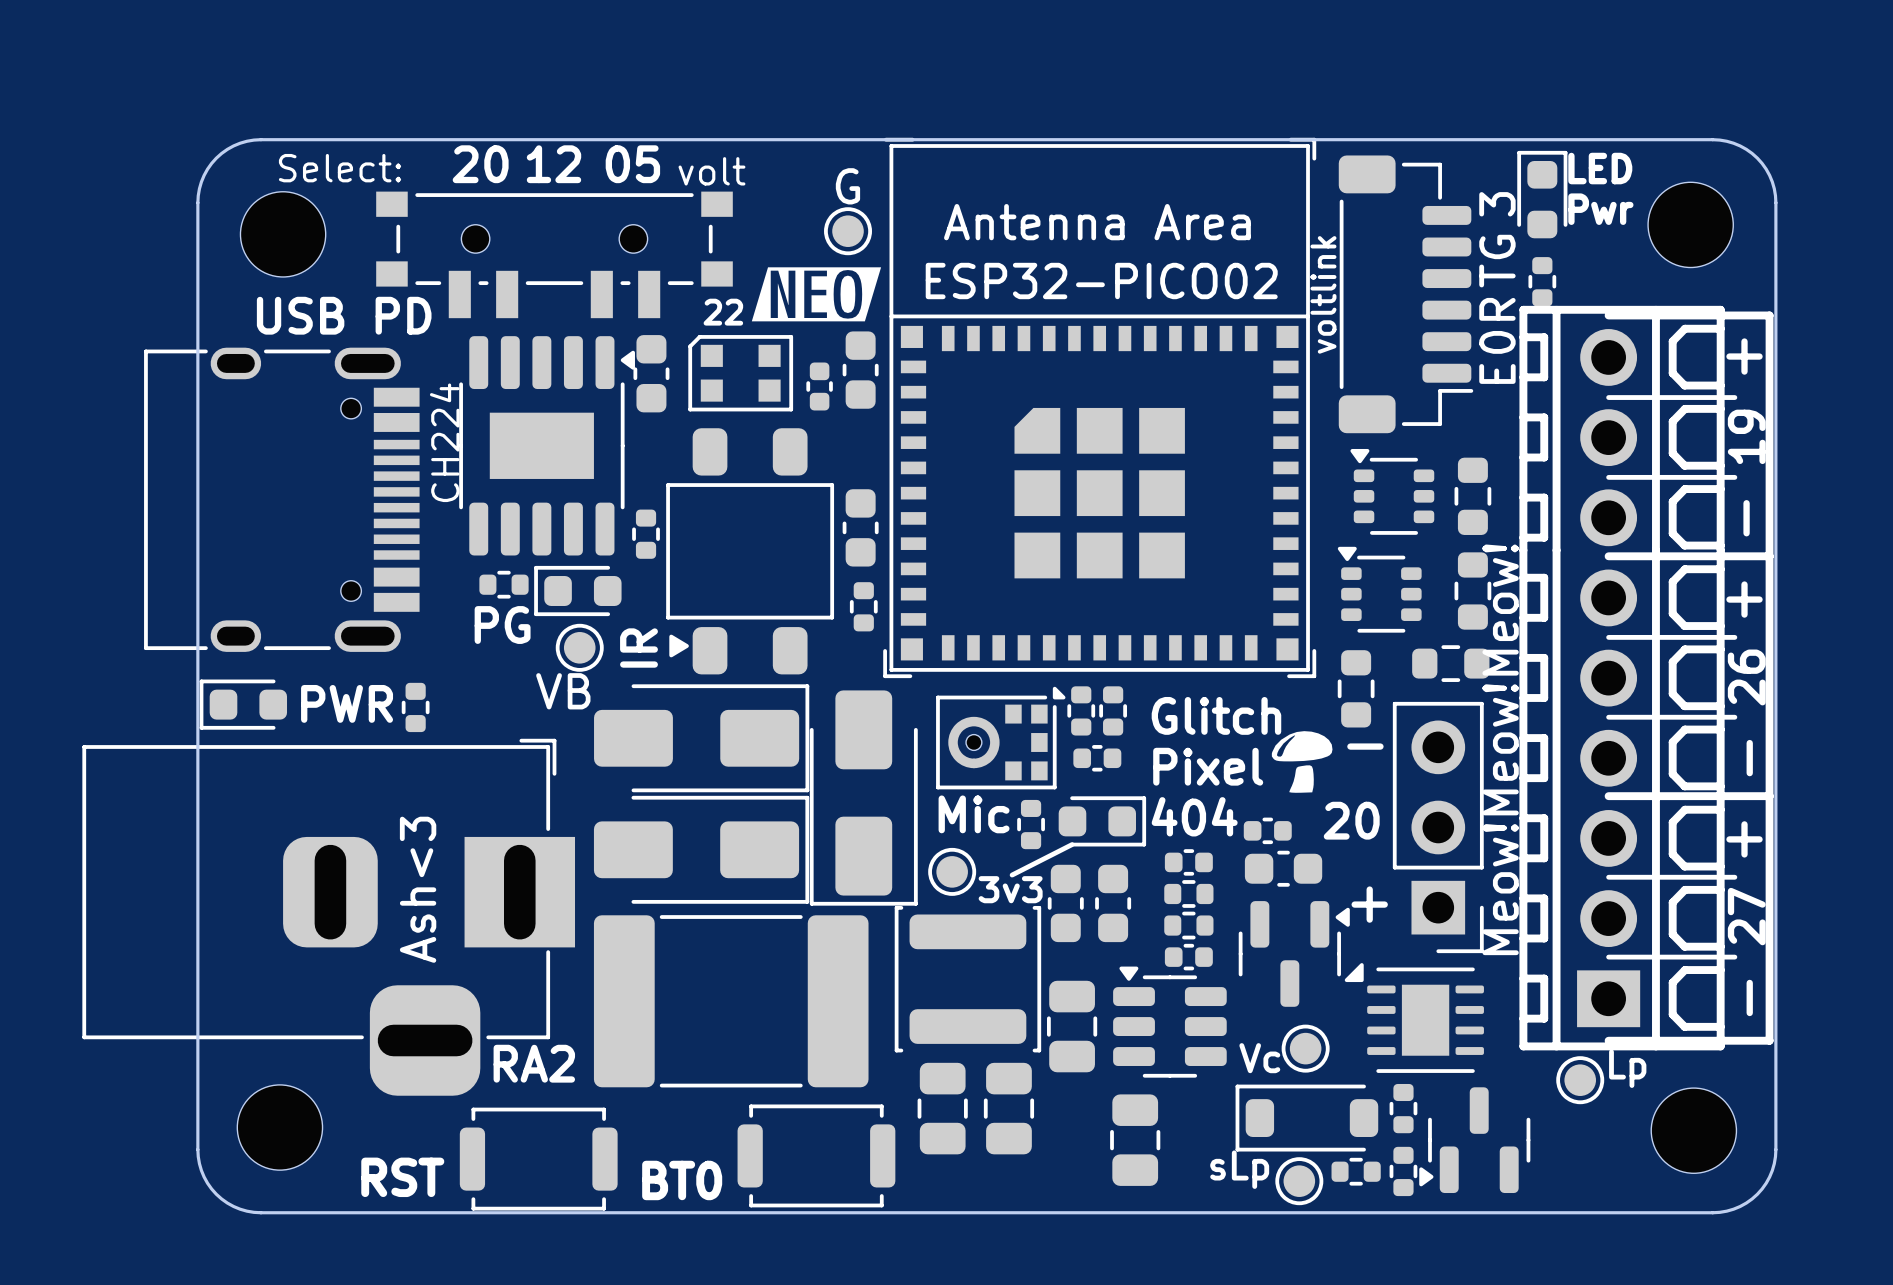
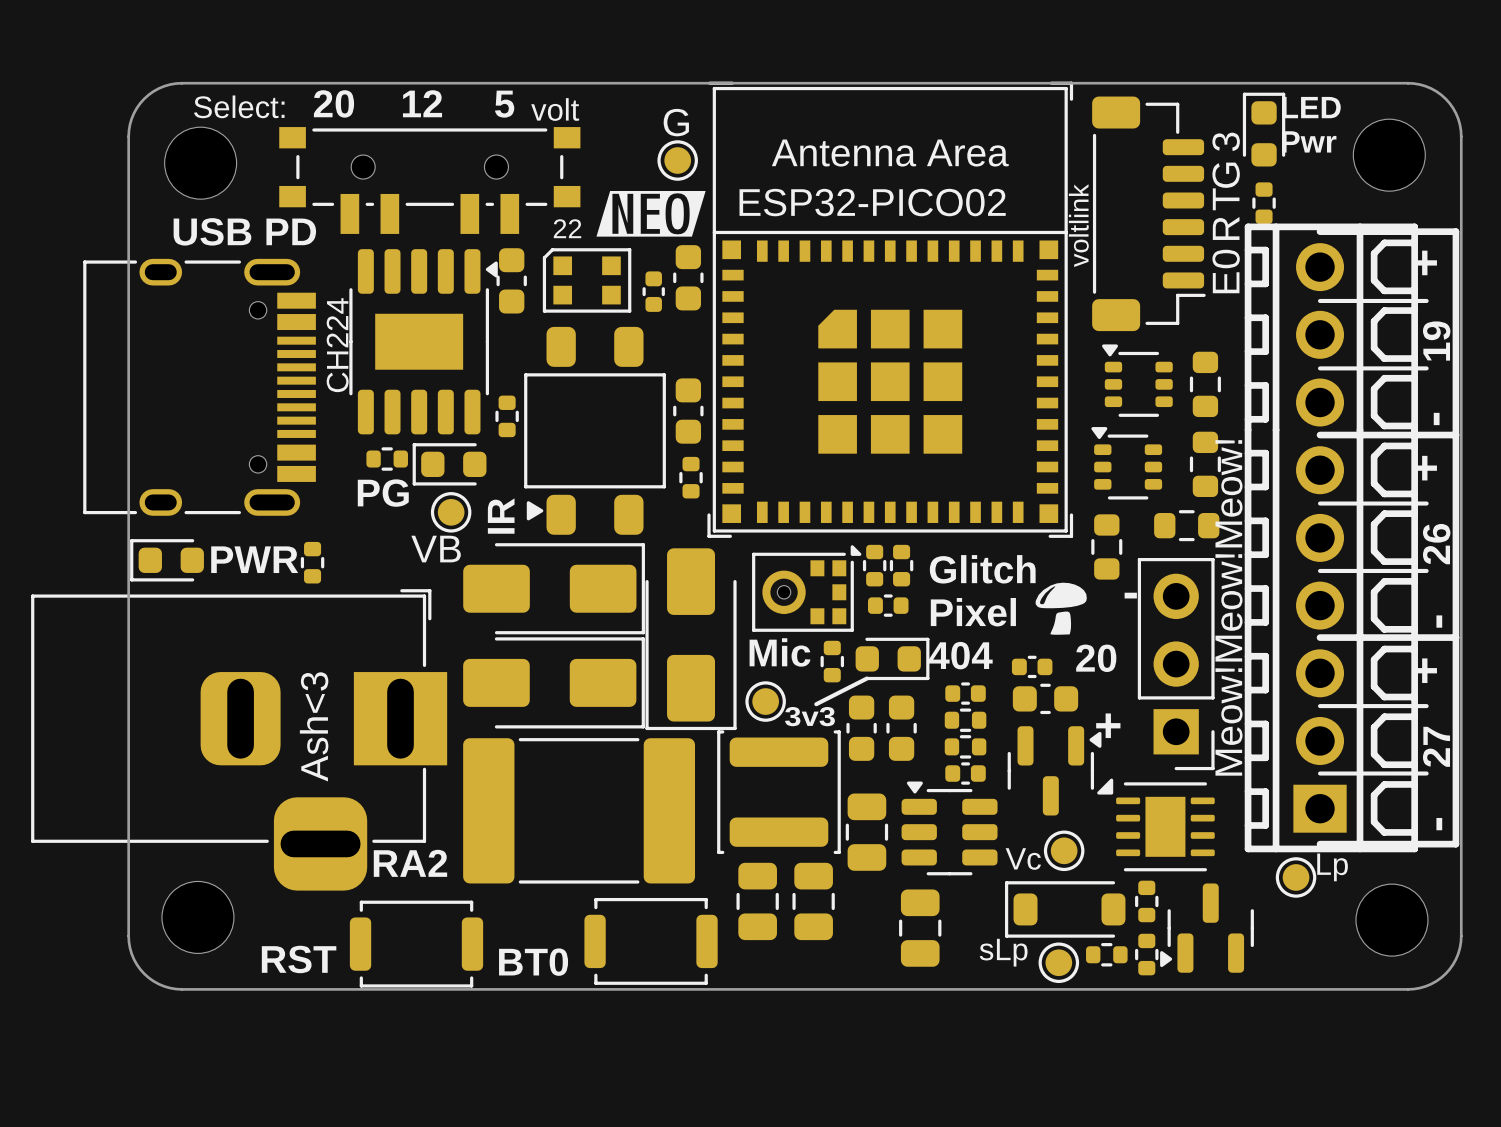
text position: 20 (480, 164) -> 20 (333, 103)
text: 05 (632, 164) -> 5 (504, 104)

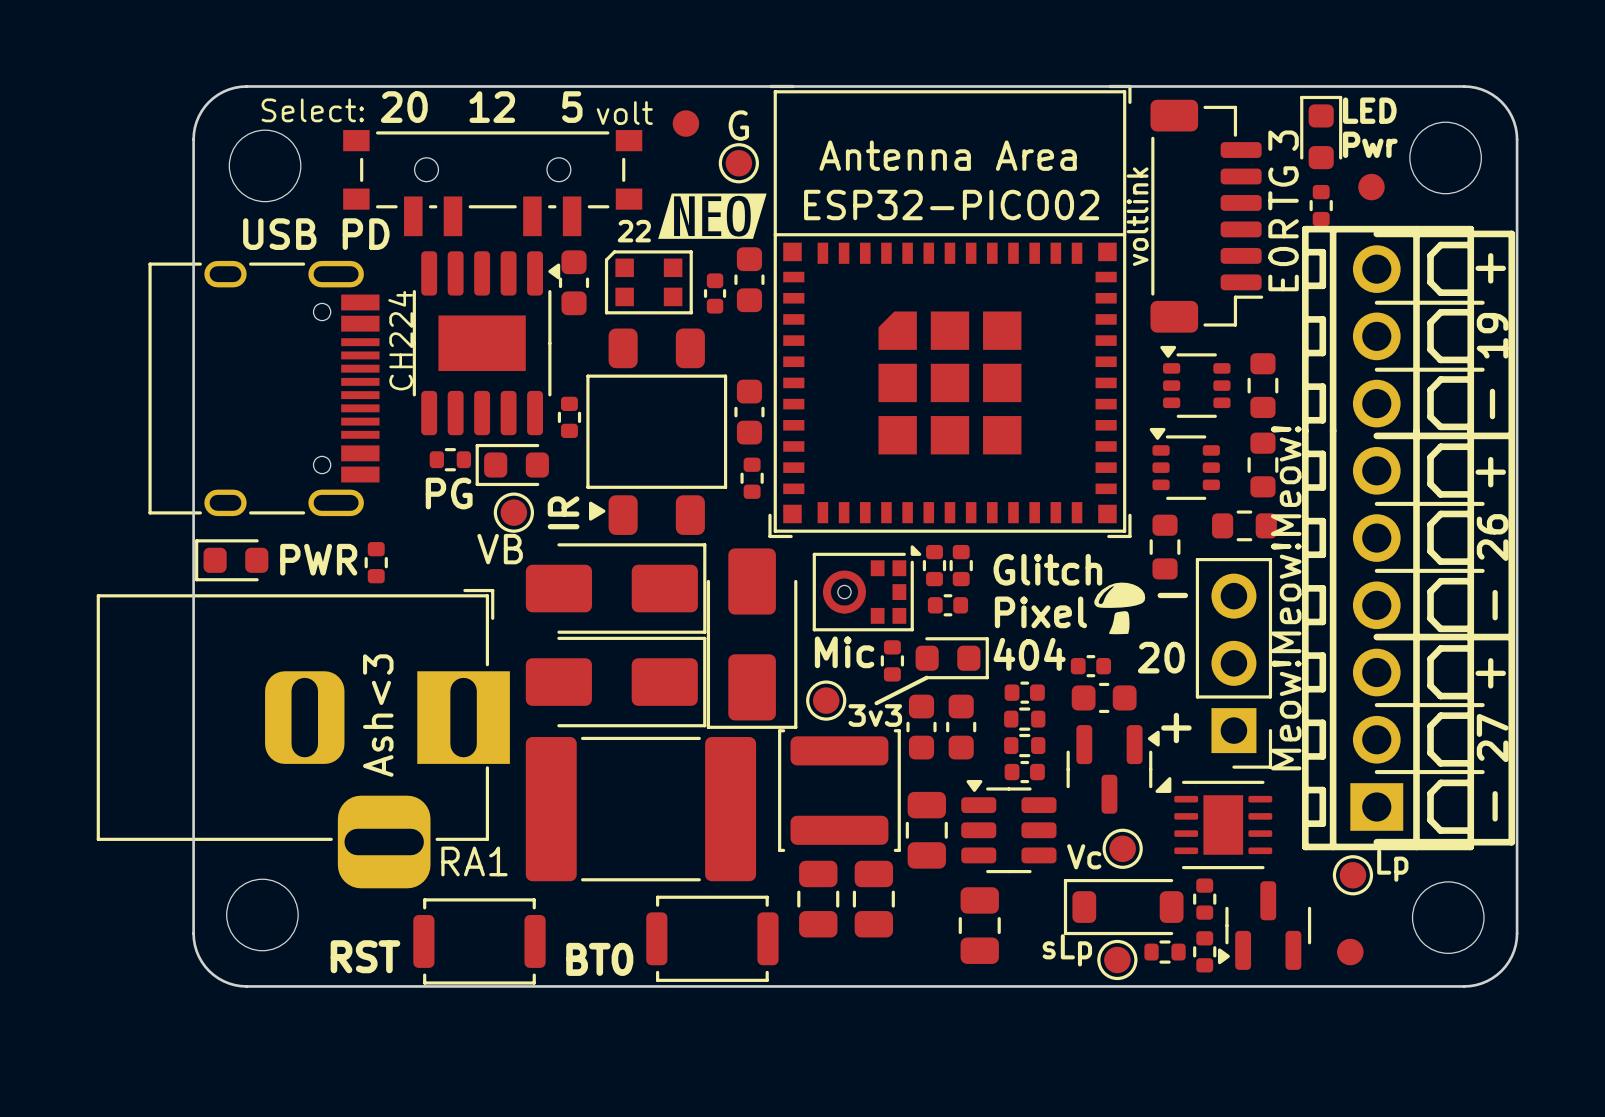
part: none -> (685, 123)
part: none -> (1371, 187)
text: RA2 (410, 863) -> RA1 (474, 861)
part: none -> (1350, 952)

